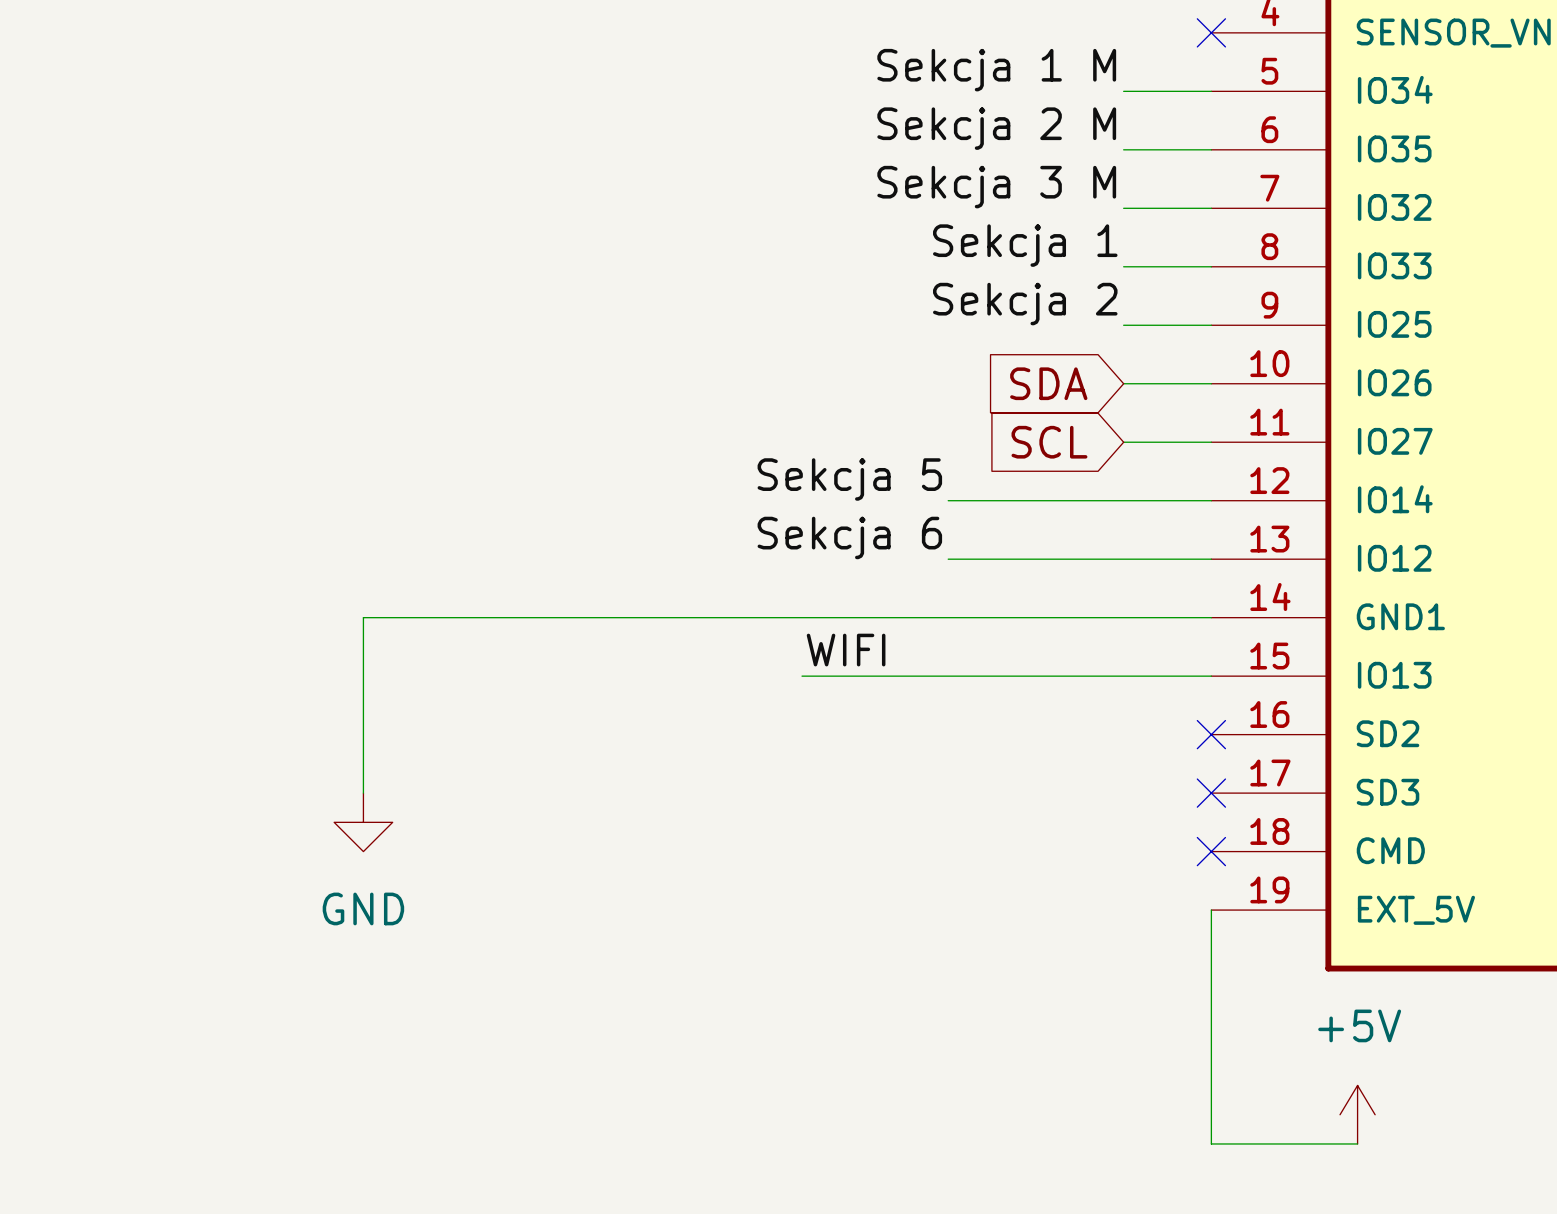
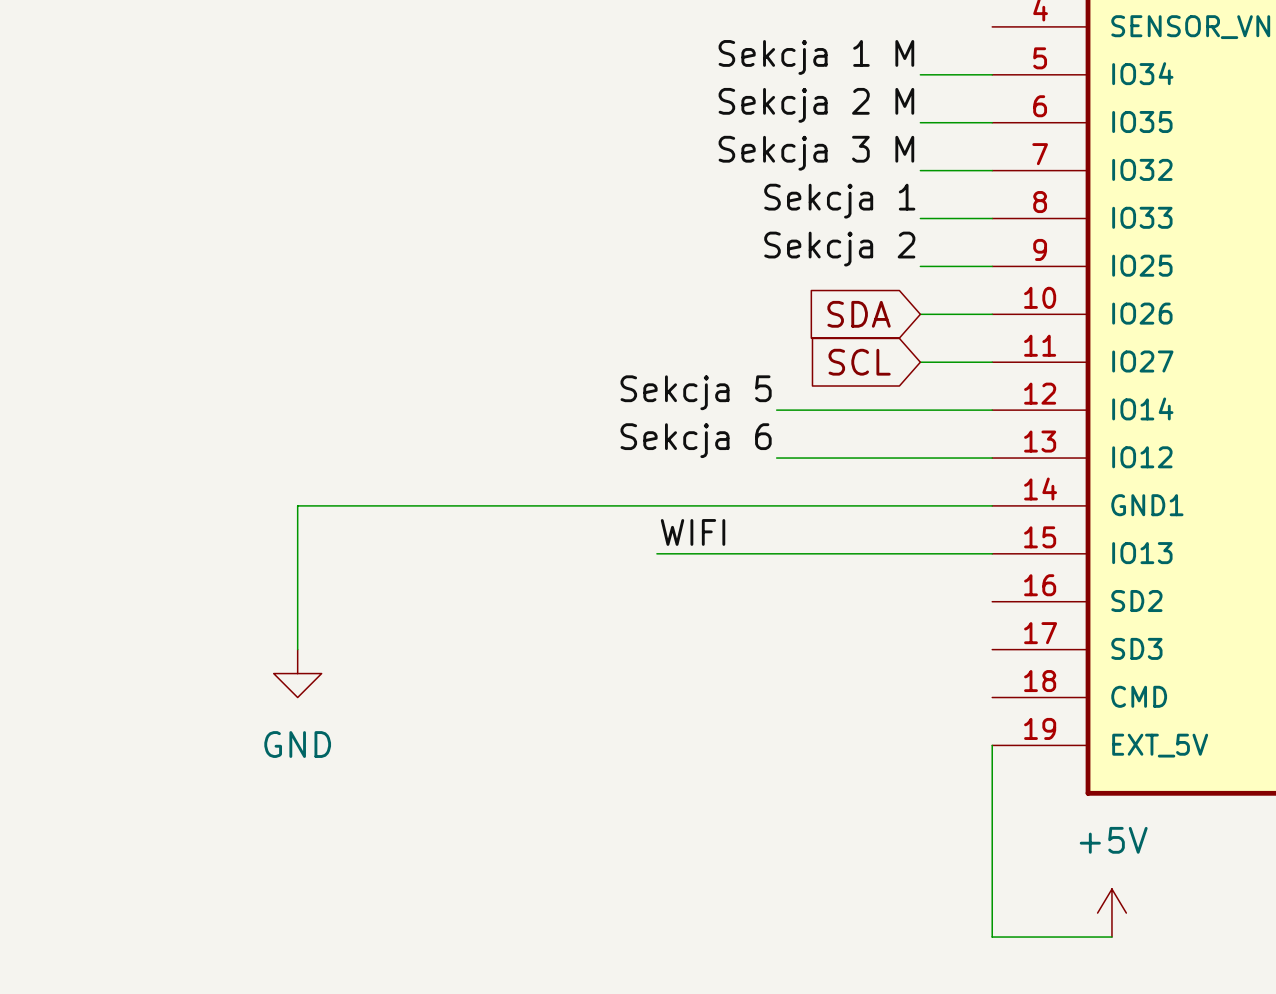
no-connect mark: (1211, 32) -> none
no-connect mark: (1211, 734) -> none
no-connect mark: (1211, 793) -> none
no-connect mark: (1211, 851) -> none

